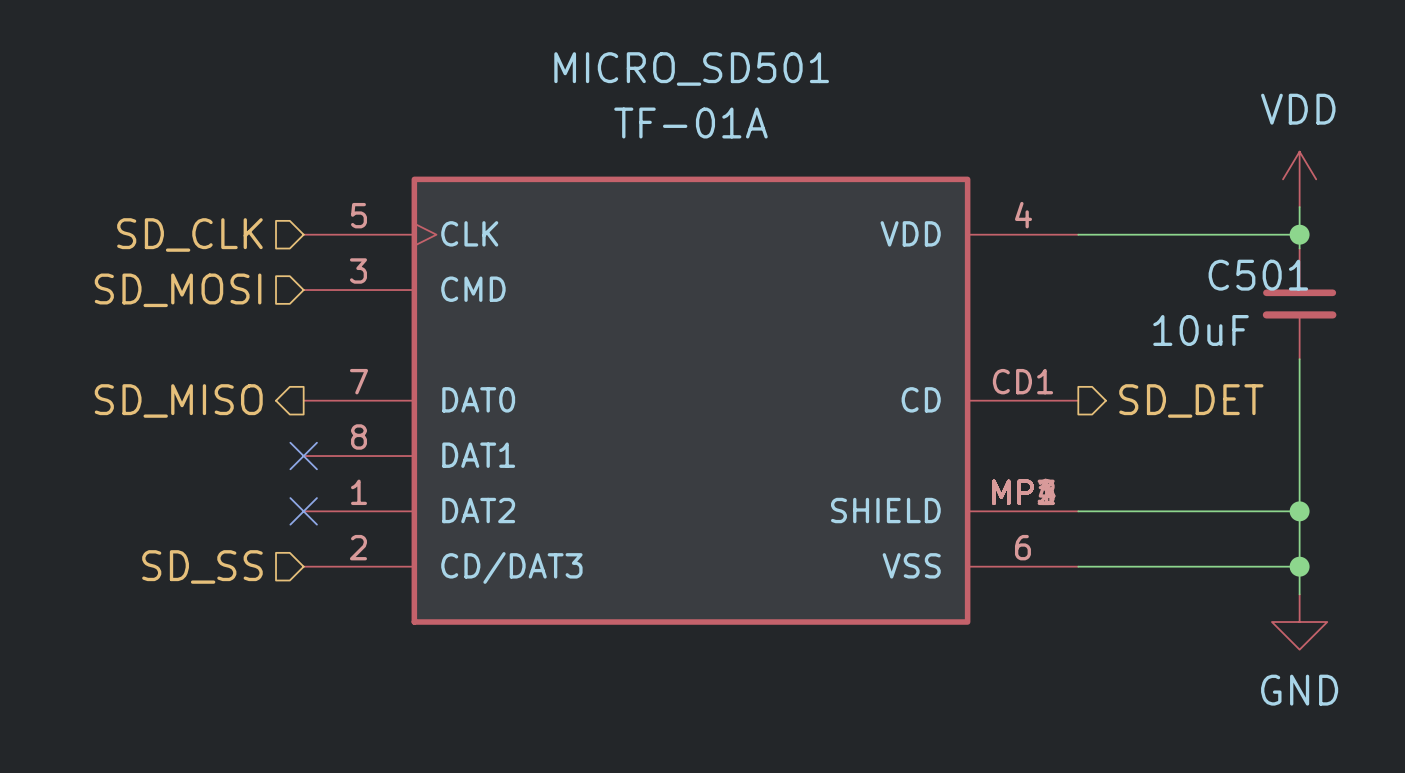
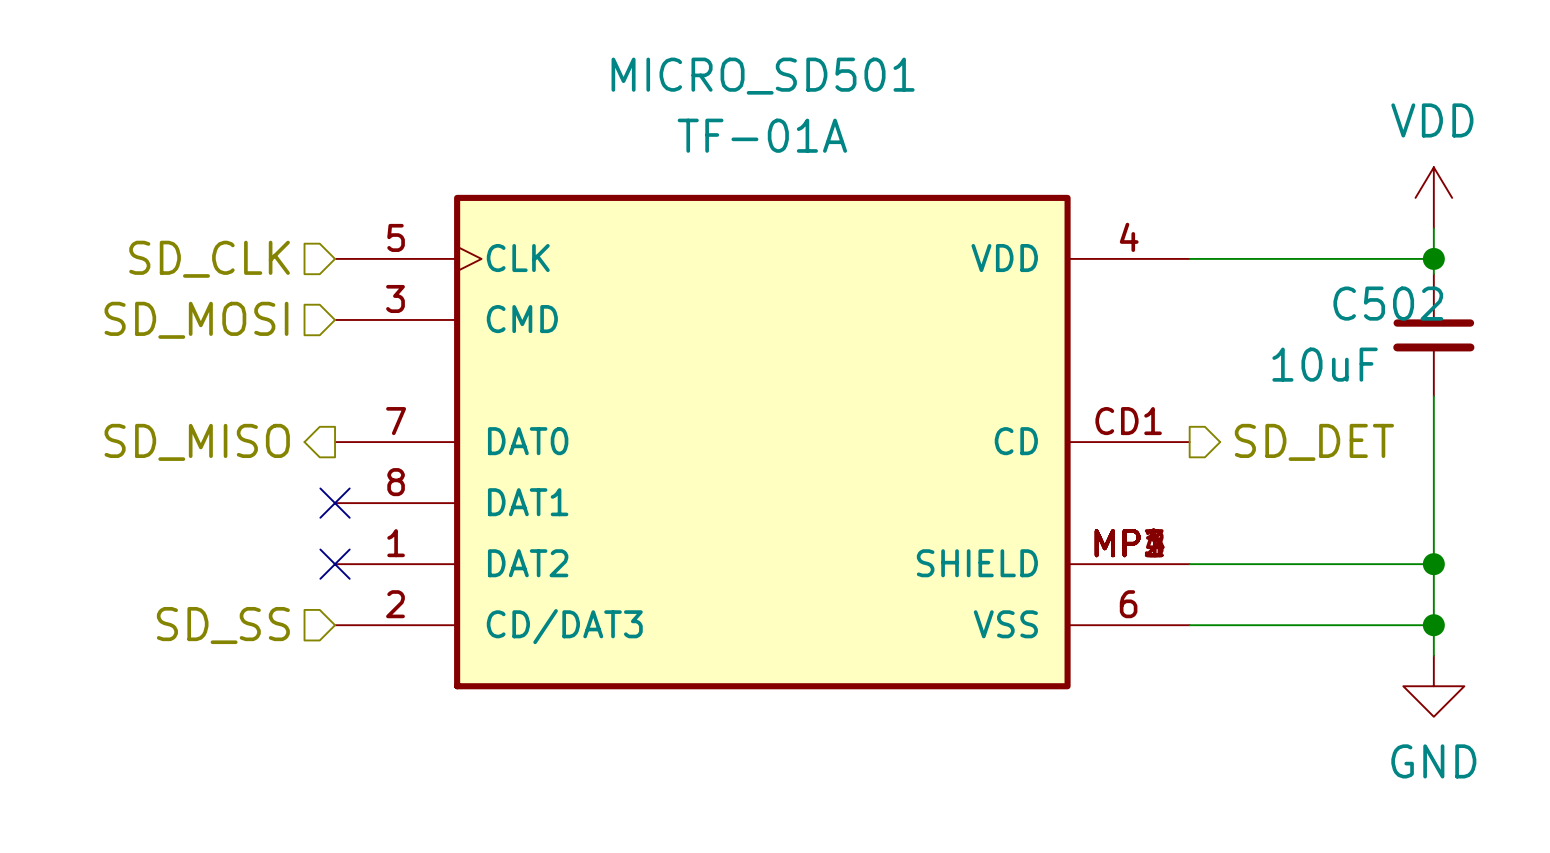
C501 name: C501 (1258, 275) -> C502 (1388, 303)

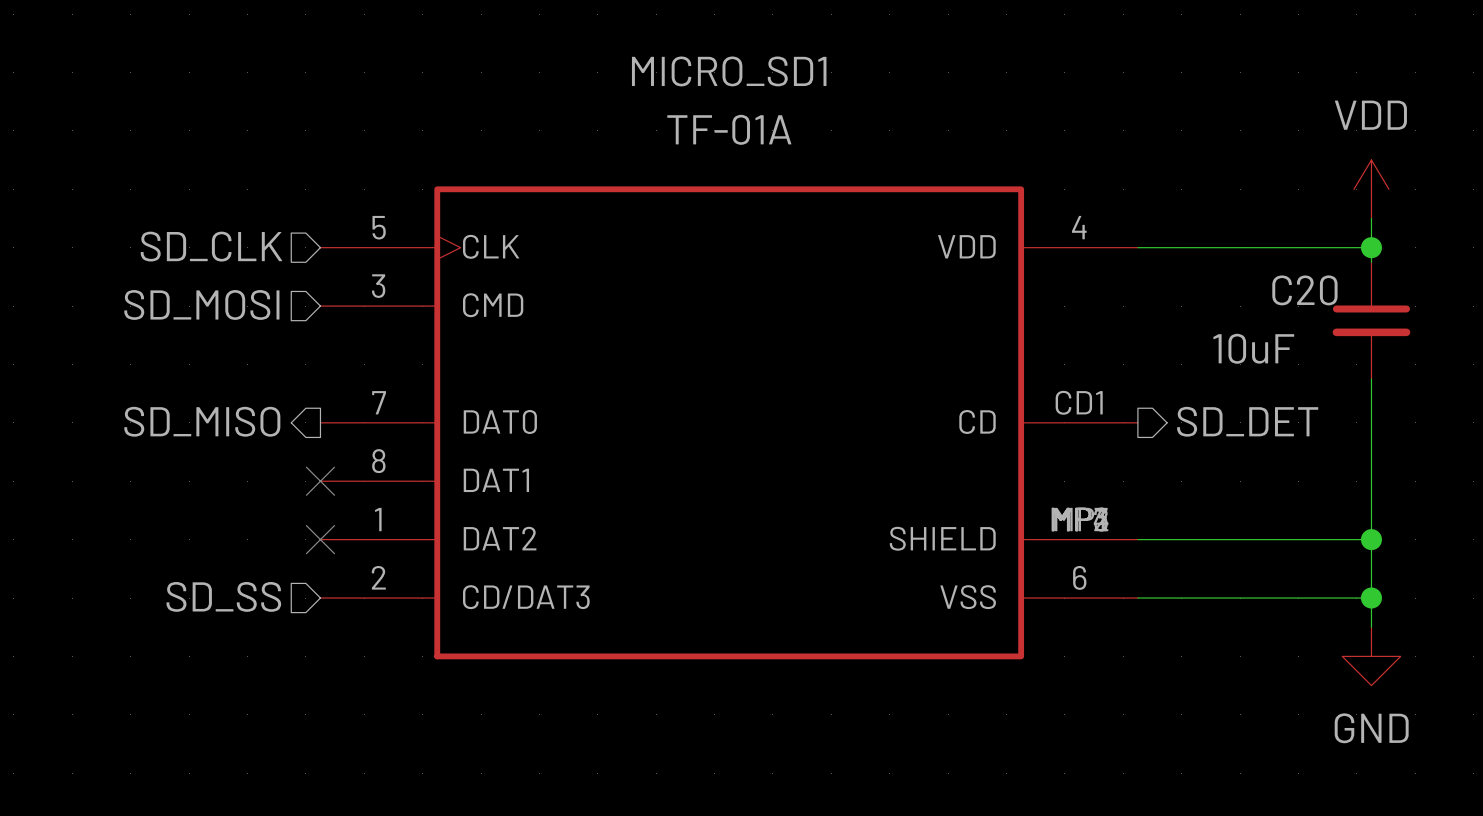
MICRO_SD501 name: MICRO_SD501 (763, 76) -> MICRO_SD1 (729, 71)
C502 name: C502 (1388, 303) -> C20 (1304, 290)

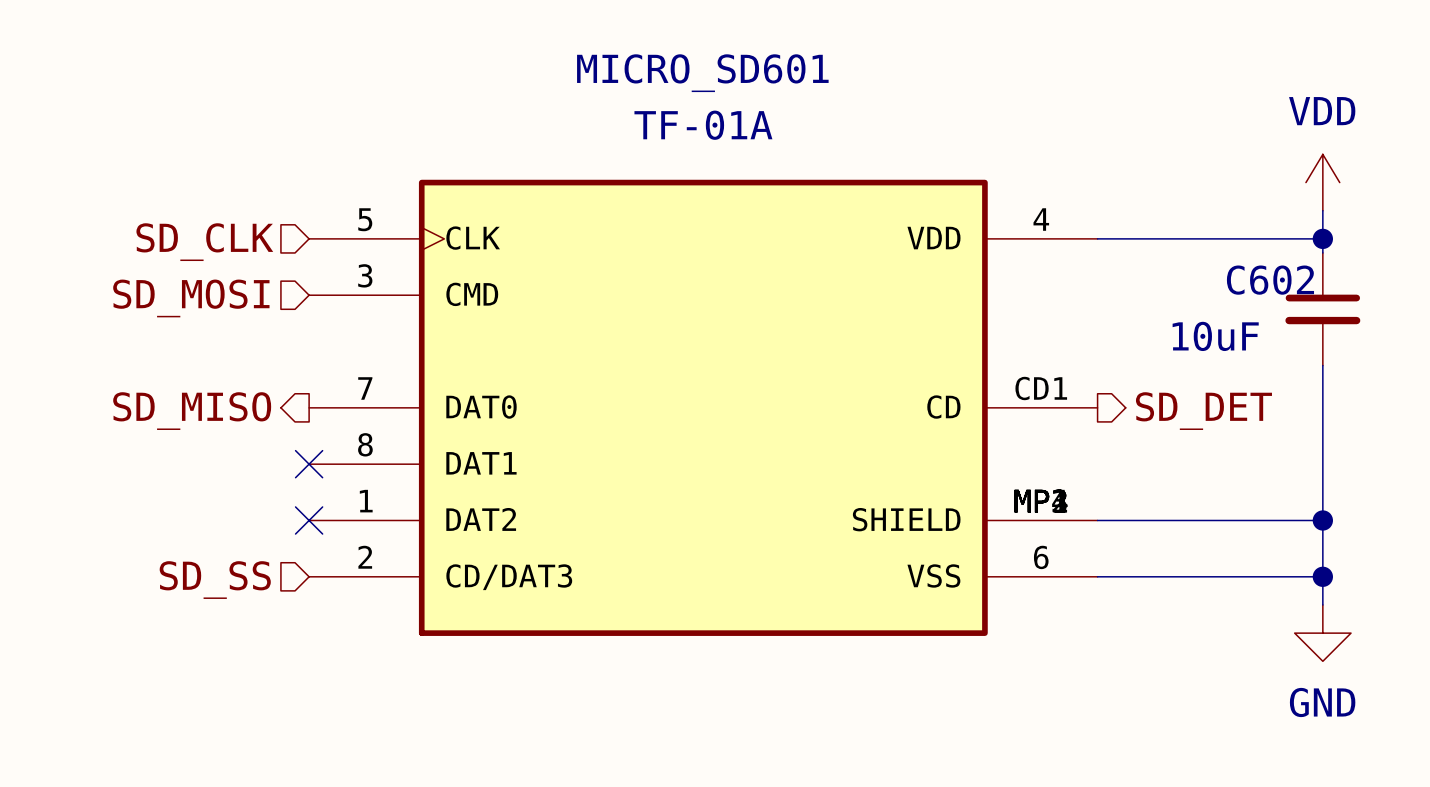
MICRO_SD1 name: MICRO_SD1 (729, 71) -> MICRO_SD601 (702, 73)
C20 name: C20 (1304, 290) -> C602 (1270, 280)

